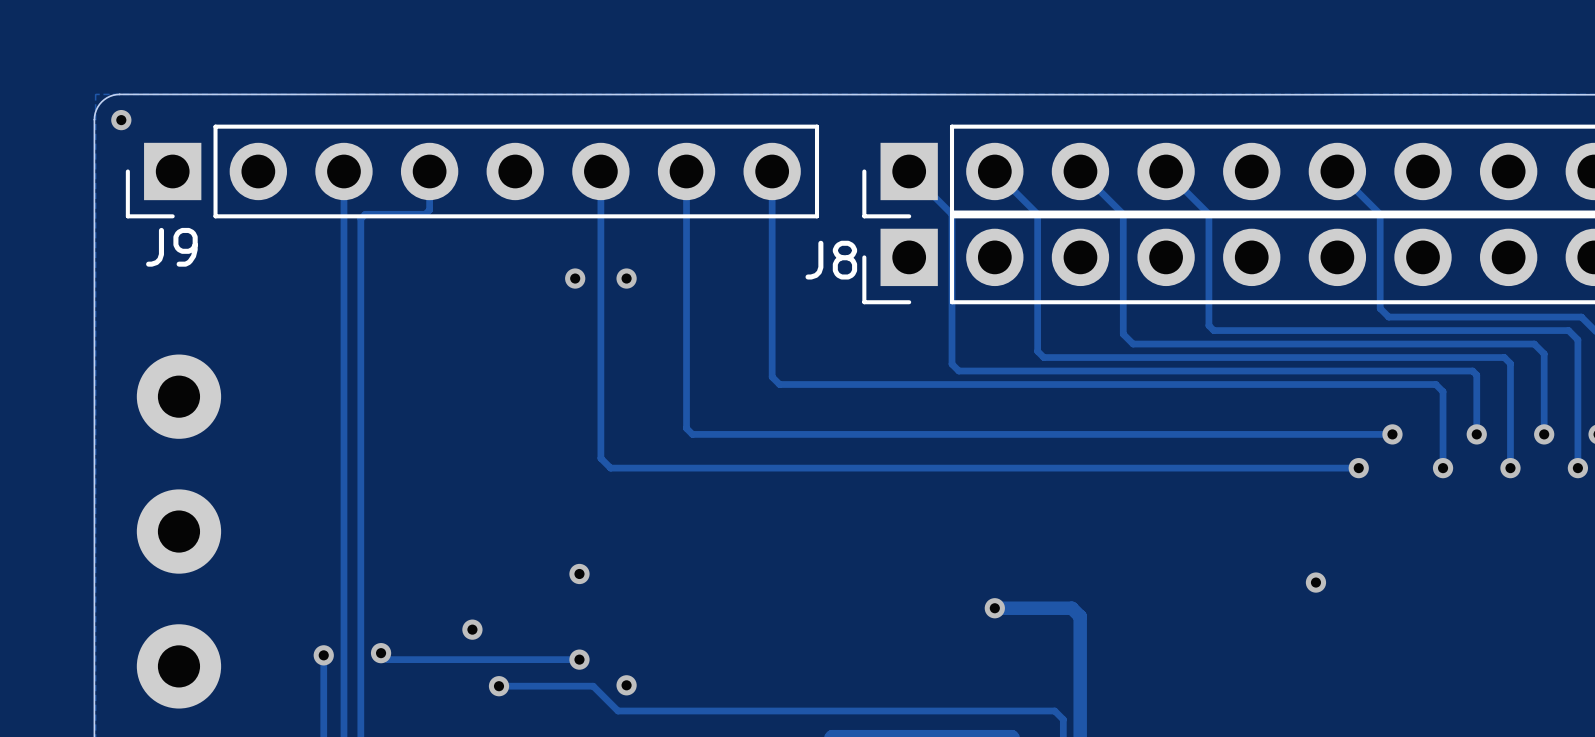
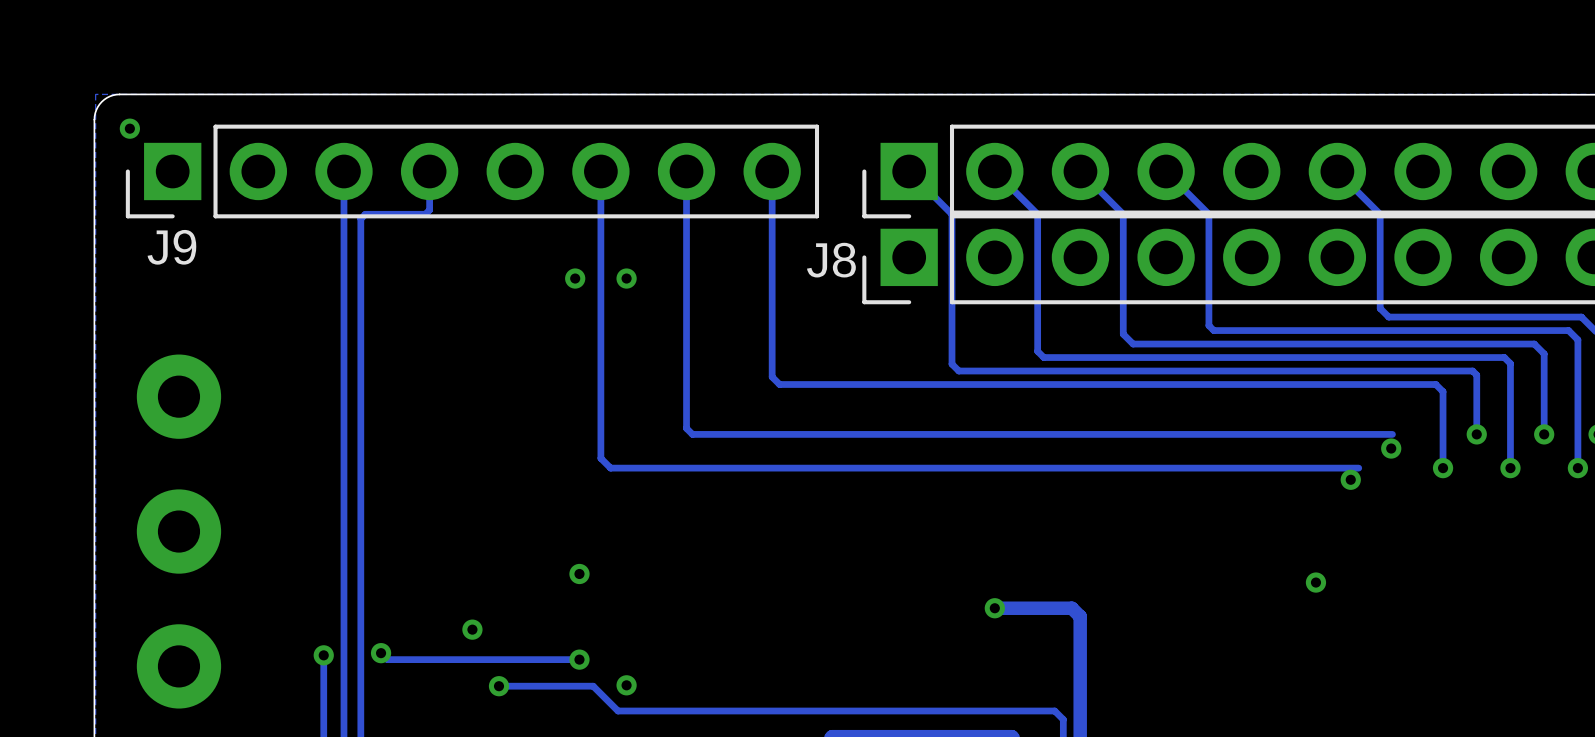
via position: (121, 120) -> (129, 128)
via position: (1392, 434) -> (1391, 448)
via position: (1358, 468) -> (1350, 479)

